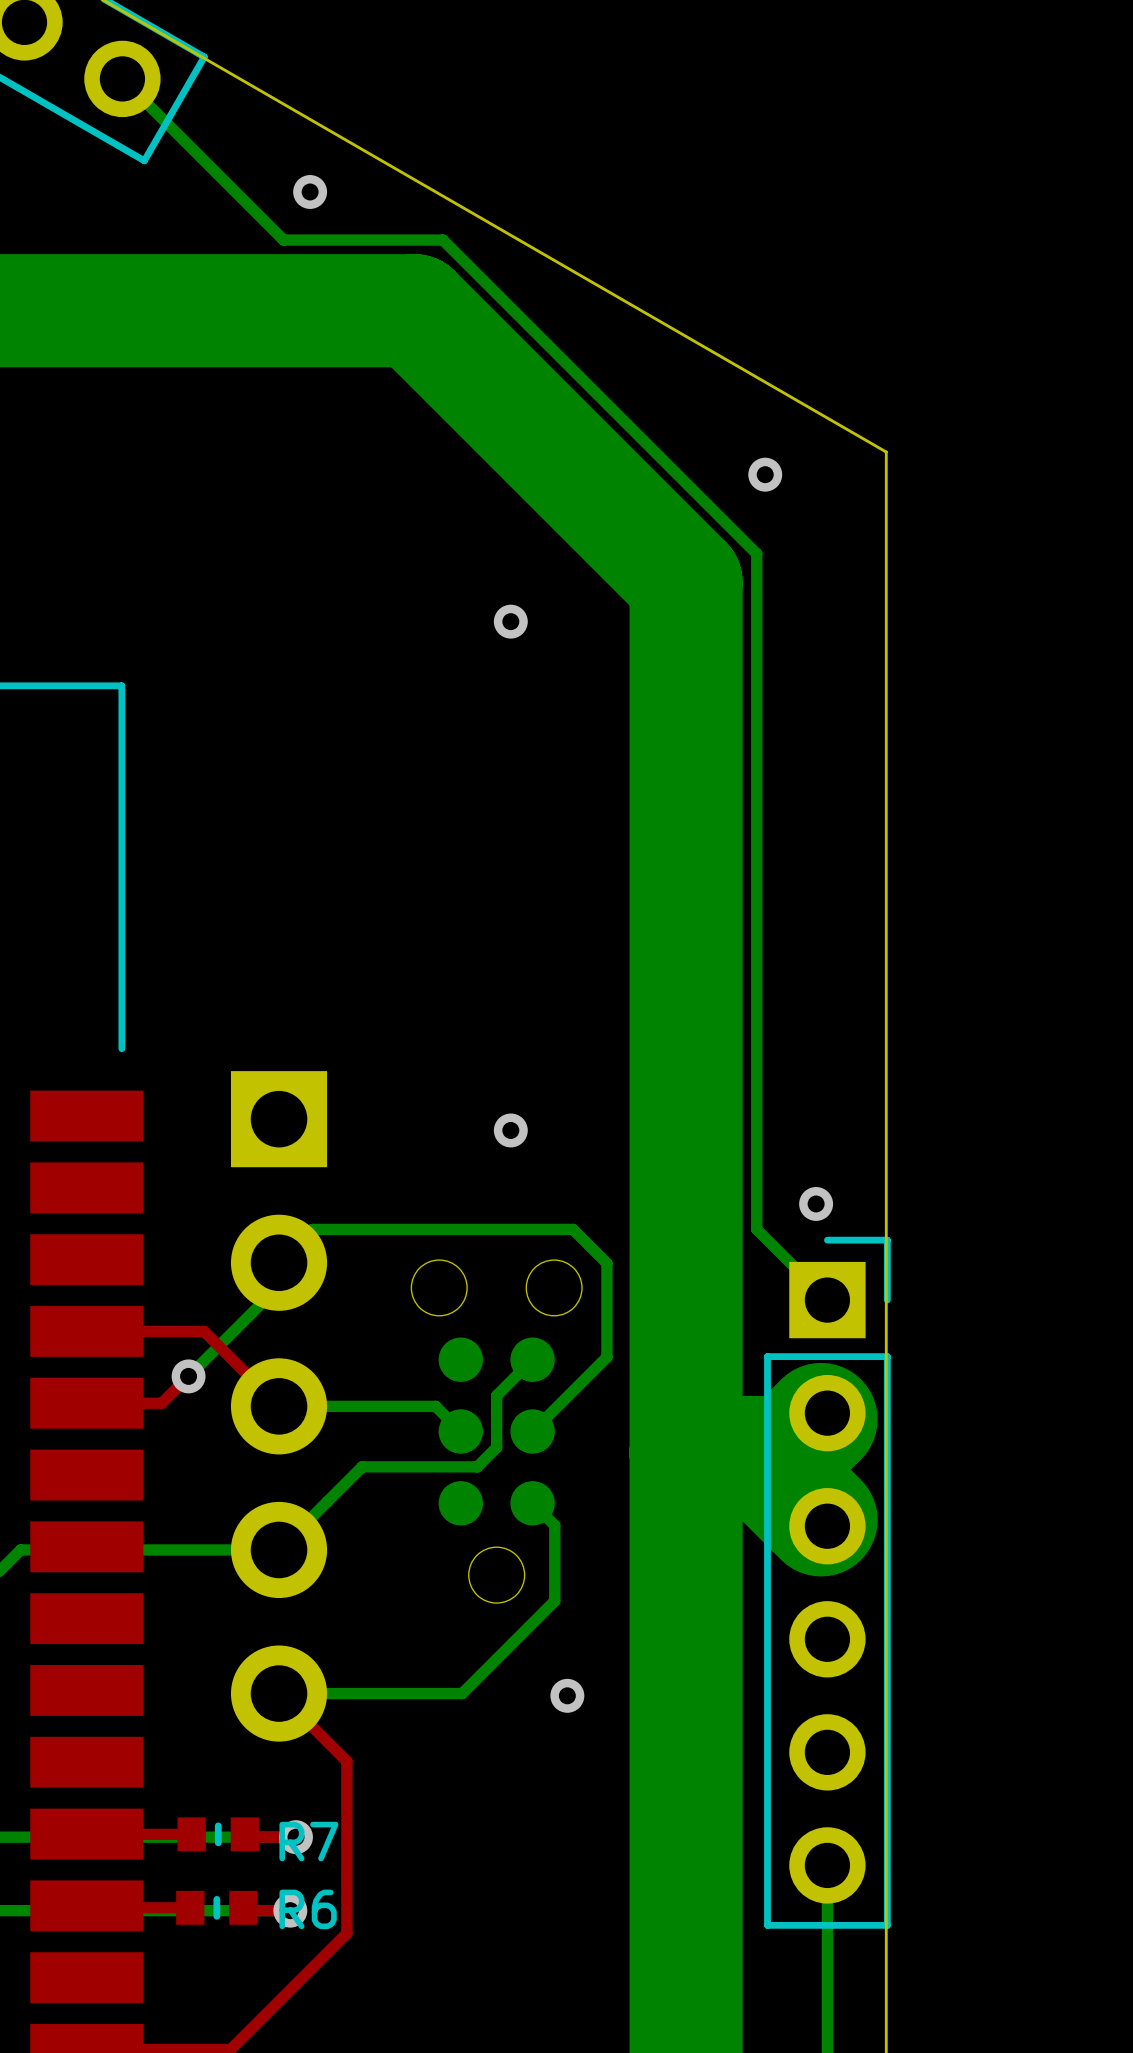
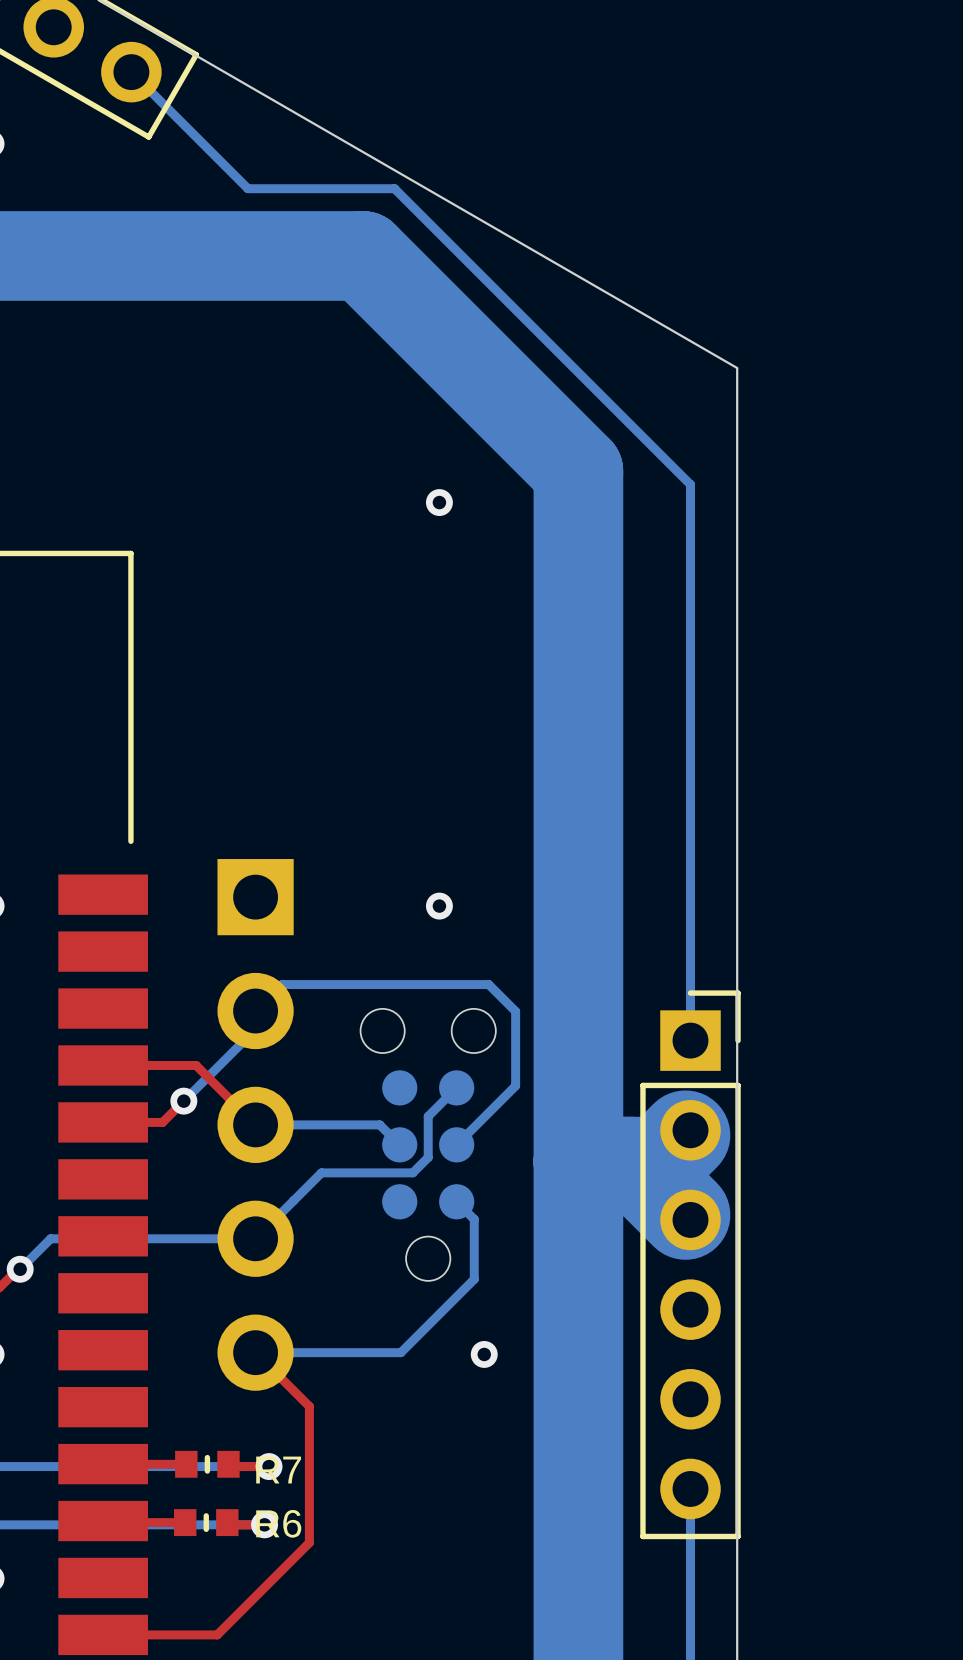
via: (310, 191) -> none
bottom track: (269, 225) (283, 240) (442, 240) (756, 553) (756, 1229) (827, 1300) -> (247, 188) (394, 188) (690, 484) (690, 1040)
via: (765, 474) -> none
via: (816, 1203) -> none

